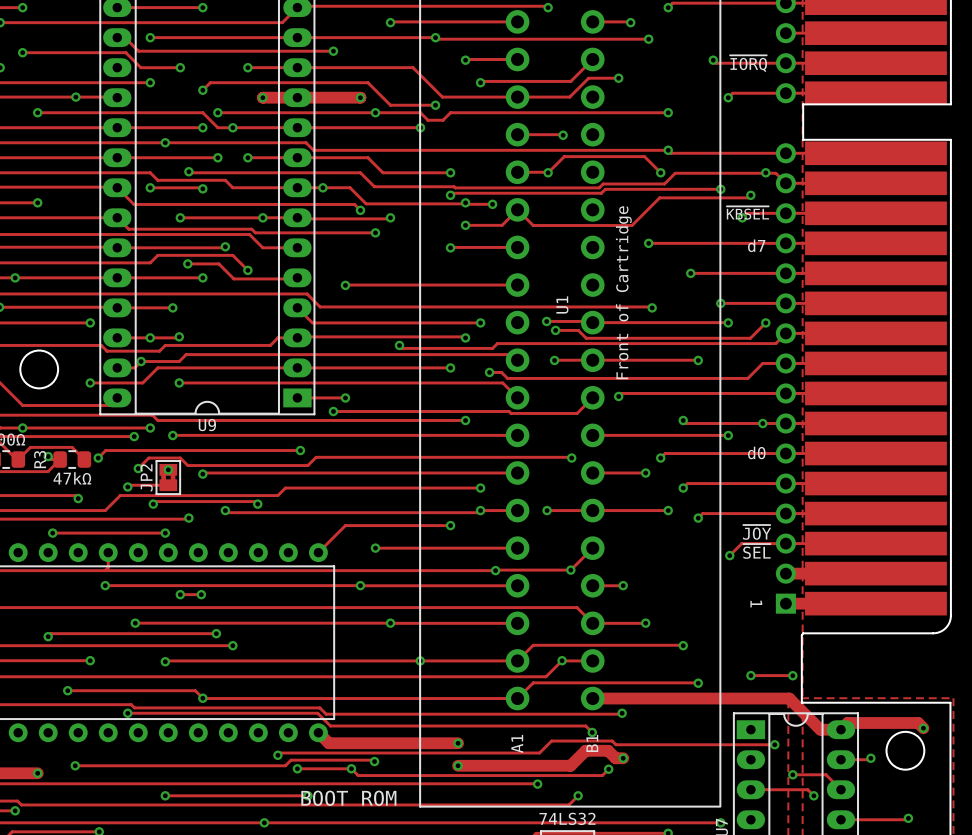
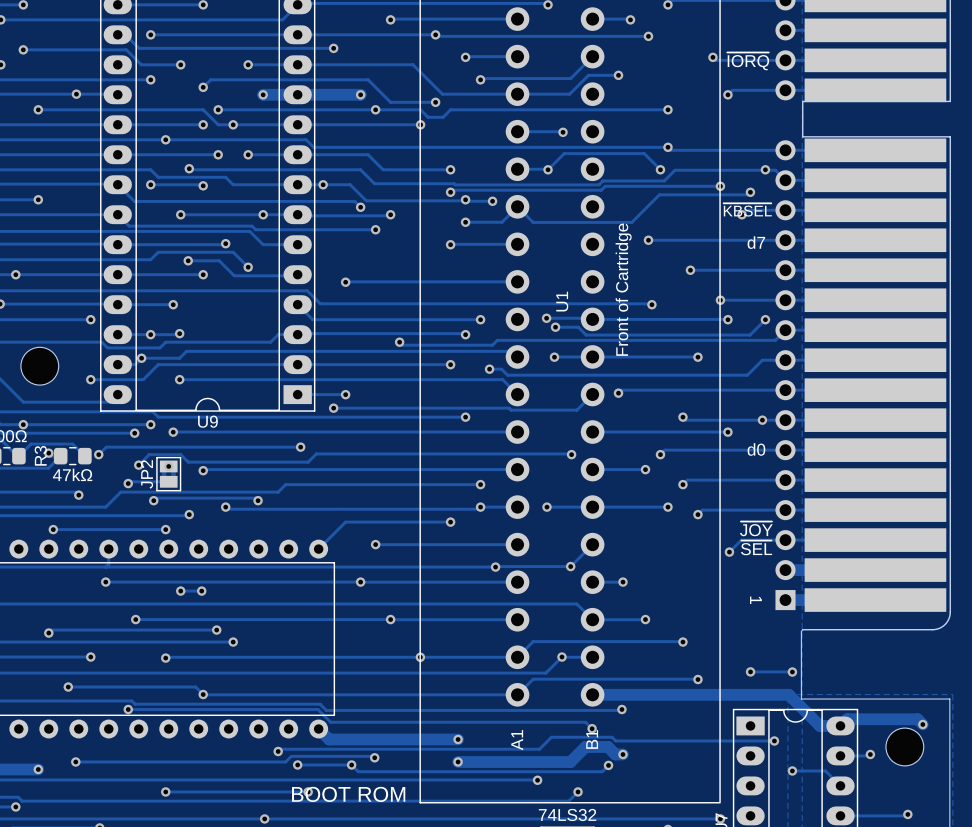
track: (750, 789) (807, 789) (813, 795) -> none
via: (813, 795) -> none

